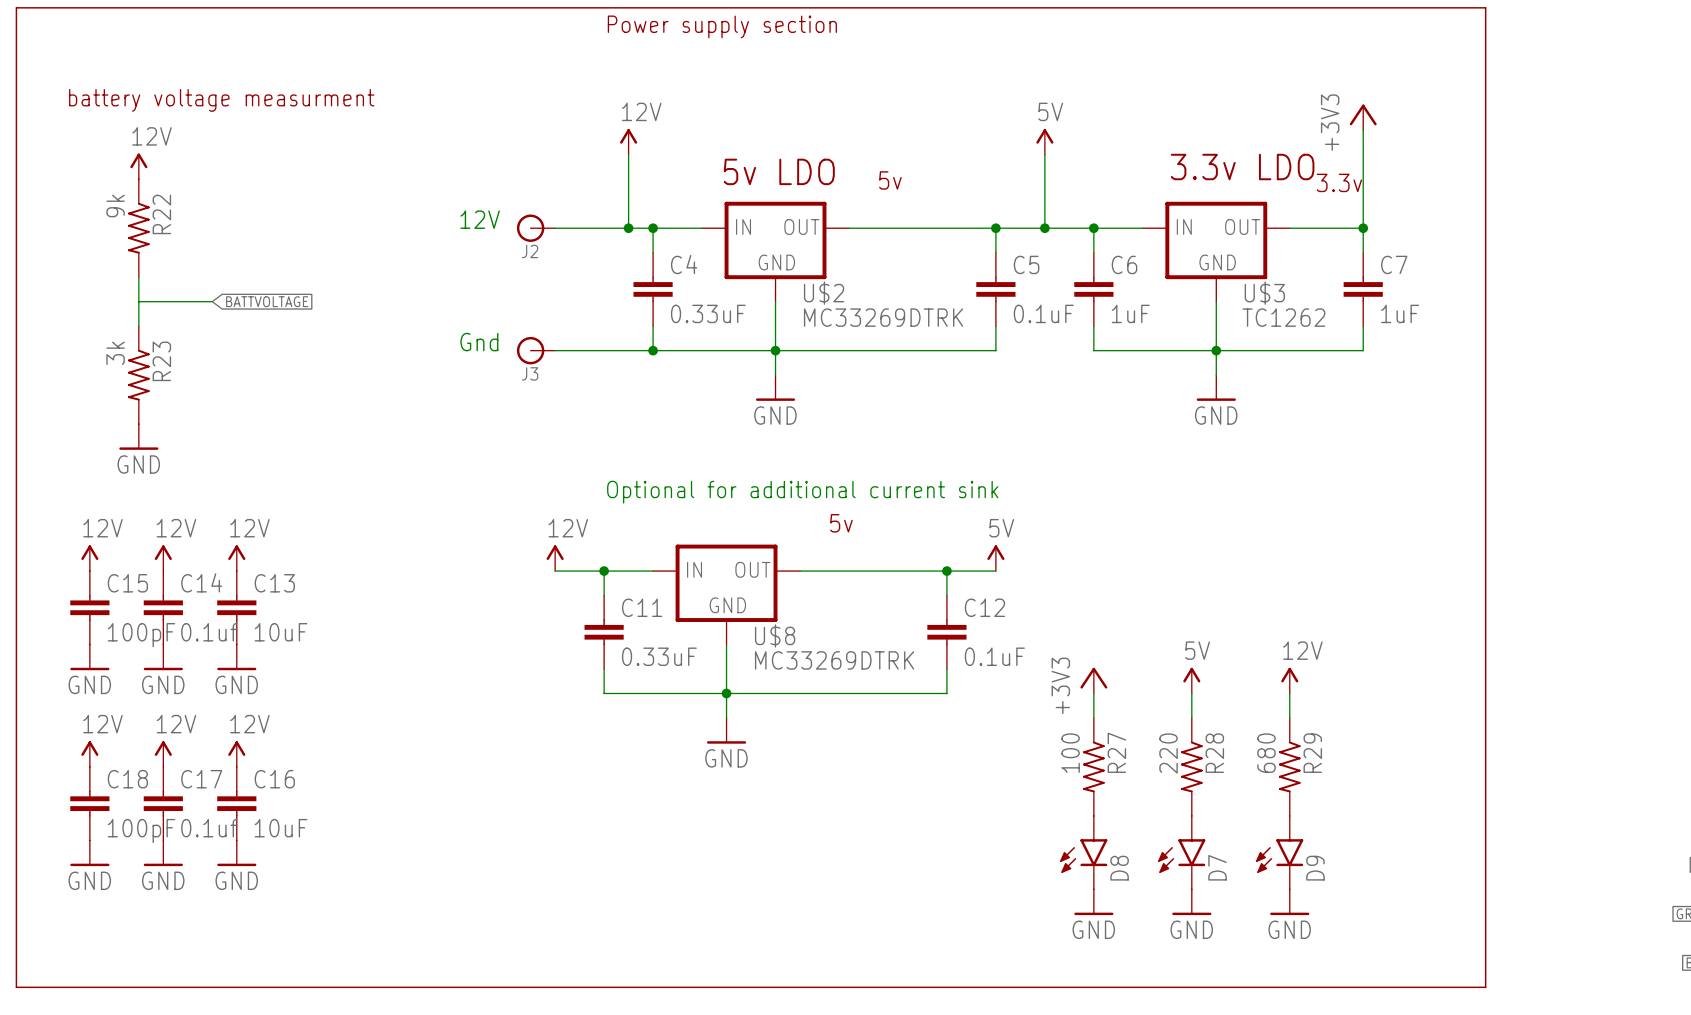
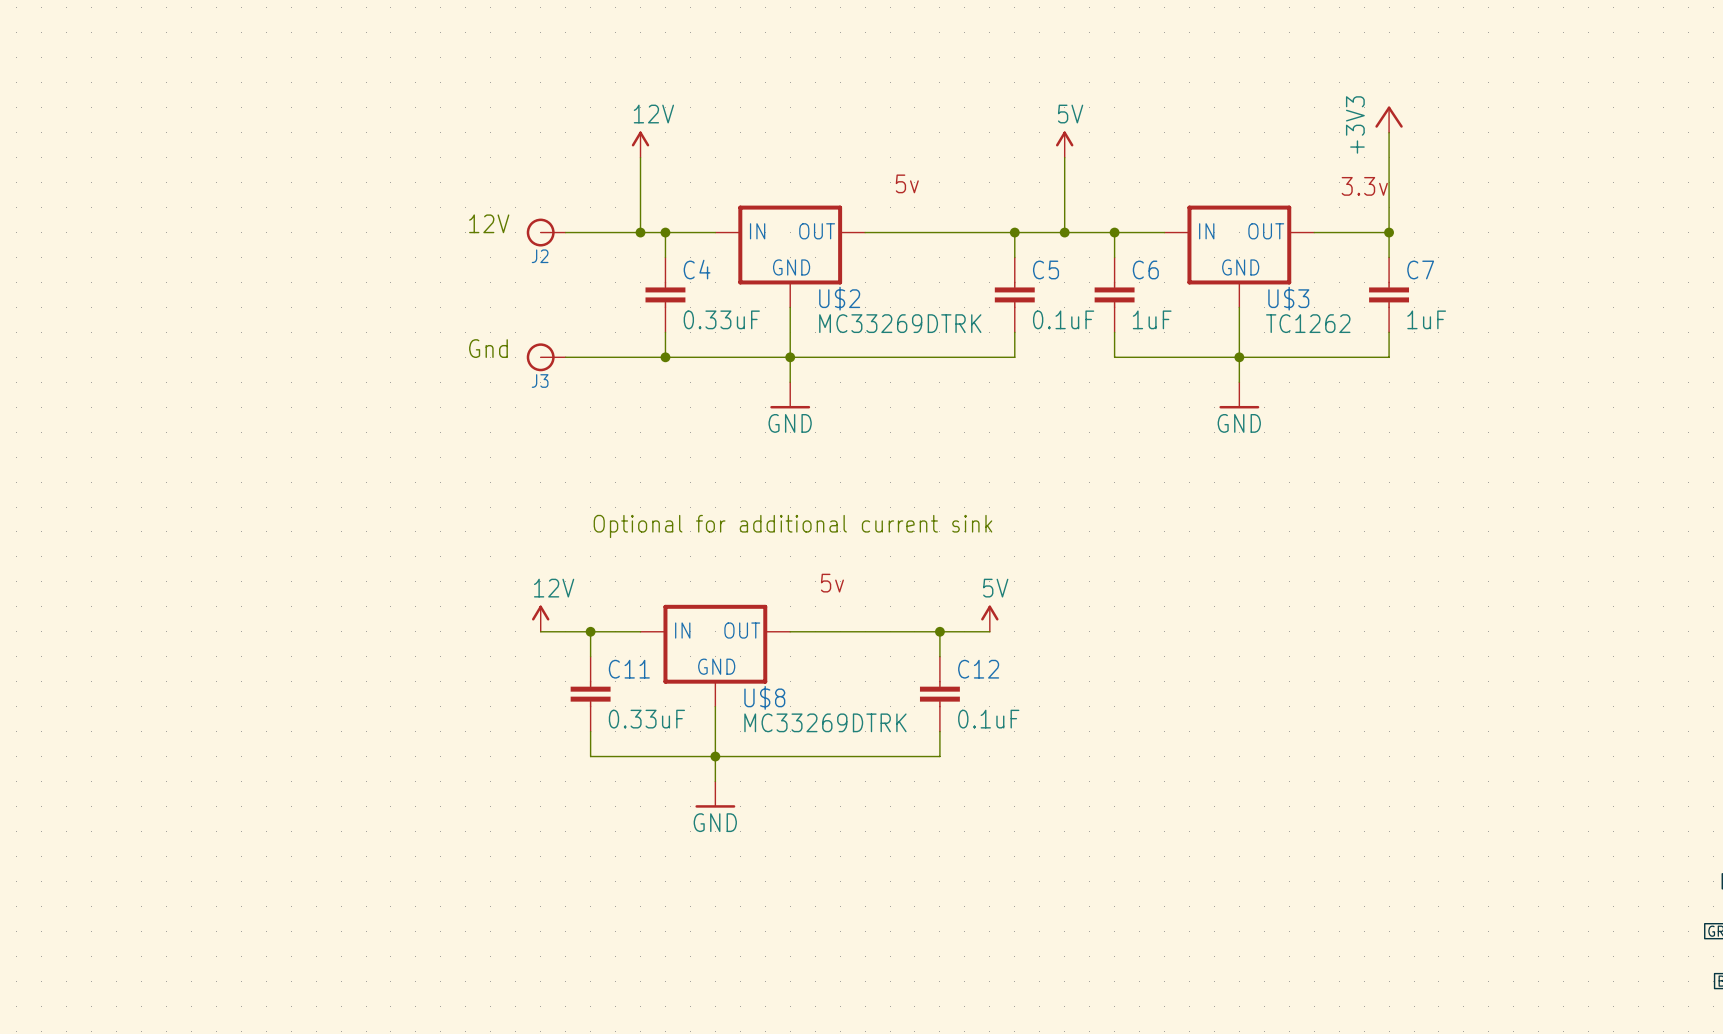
line: (16, 7) (1485, 7) (1485, 987) (16, 987) (16, 7) -> none
text: Power supply section (722, 26) -> none
text: battery voltage measurment (221, 100) -> none
power symbol: 12V (138, 166) -> none
text: 3.3v LDO (1242, 167) -> none
text: 5v LDO (779, 171) -> none
R22: 9k (138, 228) -> none
wire: (138, 277) (138, 326) -> none
wire: (138, 301) (212, 301) -> none
global label: BATTVOLTAGE (267, 301) -> none
R23: 3k (138, 375) -> none
power symbol: GND (138, 436) -> none
text position: Optional for additional current sink (802, 492) -> Optional for additional current sink (792, 526)
power symbol: 12V (89, 558) -> none
power symbol: 12V (163, 558) -> none
power symbol: 12V (236, 558) -> none
power symbol position: 12V (555, 558) -> 12V (540, 618)
power symbol position: 5V (995, 558) -> 5V (989, 618)
wire: (555, 571) (653, 571) -> (540, 631) (640, 631)
wire: (604, 571) (604, 595) -> (590, 631) (590, 656)
junction position: (604, 571) -> (590, 631)
wire: (800, 571) (995, 571) -> (790, 631) (989, 631)
wire: (946, 571) (946, 595) -> (939, 631) (939, 656)
junction position: (946, 571) -> (939, 631)
U$8 position: (726, 594) -> (715, 655)
C15: 100pF (89, 607) -> none
C14: 0.1uf (163, 607) -> none
C13: 10uF (236, 607) -> none
C11 position: (604, 632) -> (590, 694)
C12 position: (946, 632) -> (939, 694)
wire: (726, 644) (726, 717) -> (715, 706) (715, 781)
power symbol: GND (89, 657) -> none
power symbol: GND (163, 657) -> none
power symbol: GND (236, 657) -> none
wire: (604, 669) (604, 693) (946, 693) (946, 669) -> (590, 731) (590, 756) (939, 756) (939, 731)
power symbol: +3V3 (1093, 680) -> none
power symbol: 5V (1191, 680) -> none
power symbol: 12V (1289, 680) -> none
junction position: (726, 693) -> (715, 756)
wire: (1093, 693) (1093, 717) -> none
wire: (1191, 693) (1191, 717) -> none
wire: (1289, 693) (1289, 717) -> none
power symbol position: GND (726, 730) -> GND (715, 794)
power symbol: 12V (89, 754) -> none
power symbol: 12V (163, 754) -> none
power symbol: 12V (236, 754) -> none
R27: 100 (1093, 766) -> none
R28: 220 (1191, 766) -> none
R29: 680 (1289, 766) -> none
C18: 100pF (89, 803) -> none
C17: 0.1uf (163, 803) -> none
C16: 10uF (236, 803) -> none
D8: (1083, 852) -> none
D7: (1181, 852) -> none
D9: (1279, 852) -> none
power symbol: GND (89, 853) -> none
power symbol: GND (163, 853) -> none
power symbol: GND (236, 853) -> none
power symbol: GND (1093, 902) -> none
power symbol: GND (1191, 902) -> none
power symbol: GND (1289, 902) -> none

